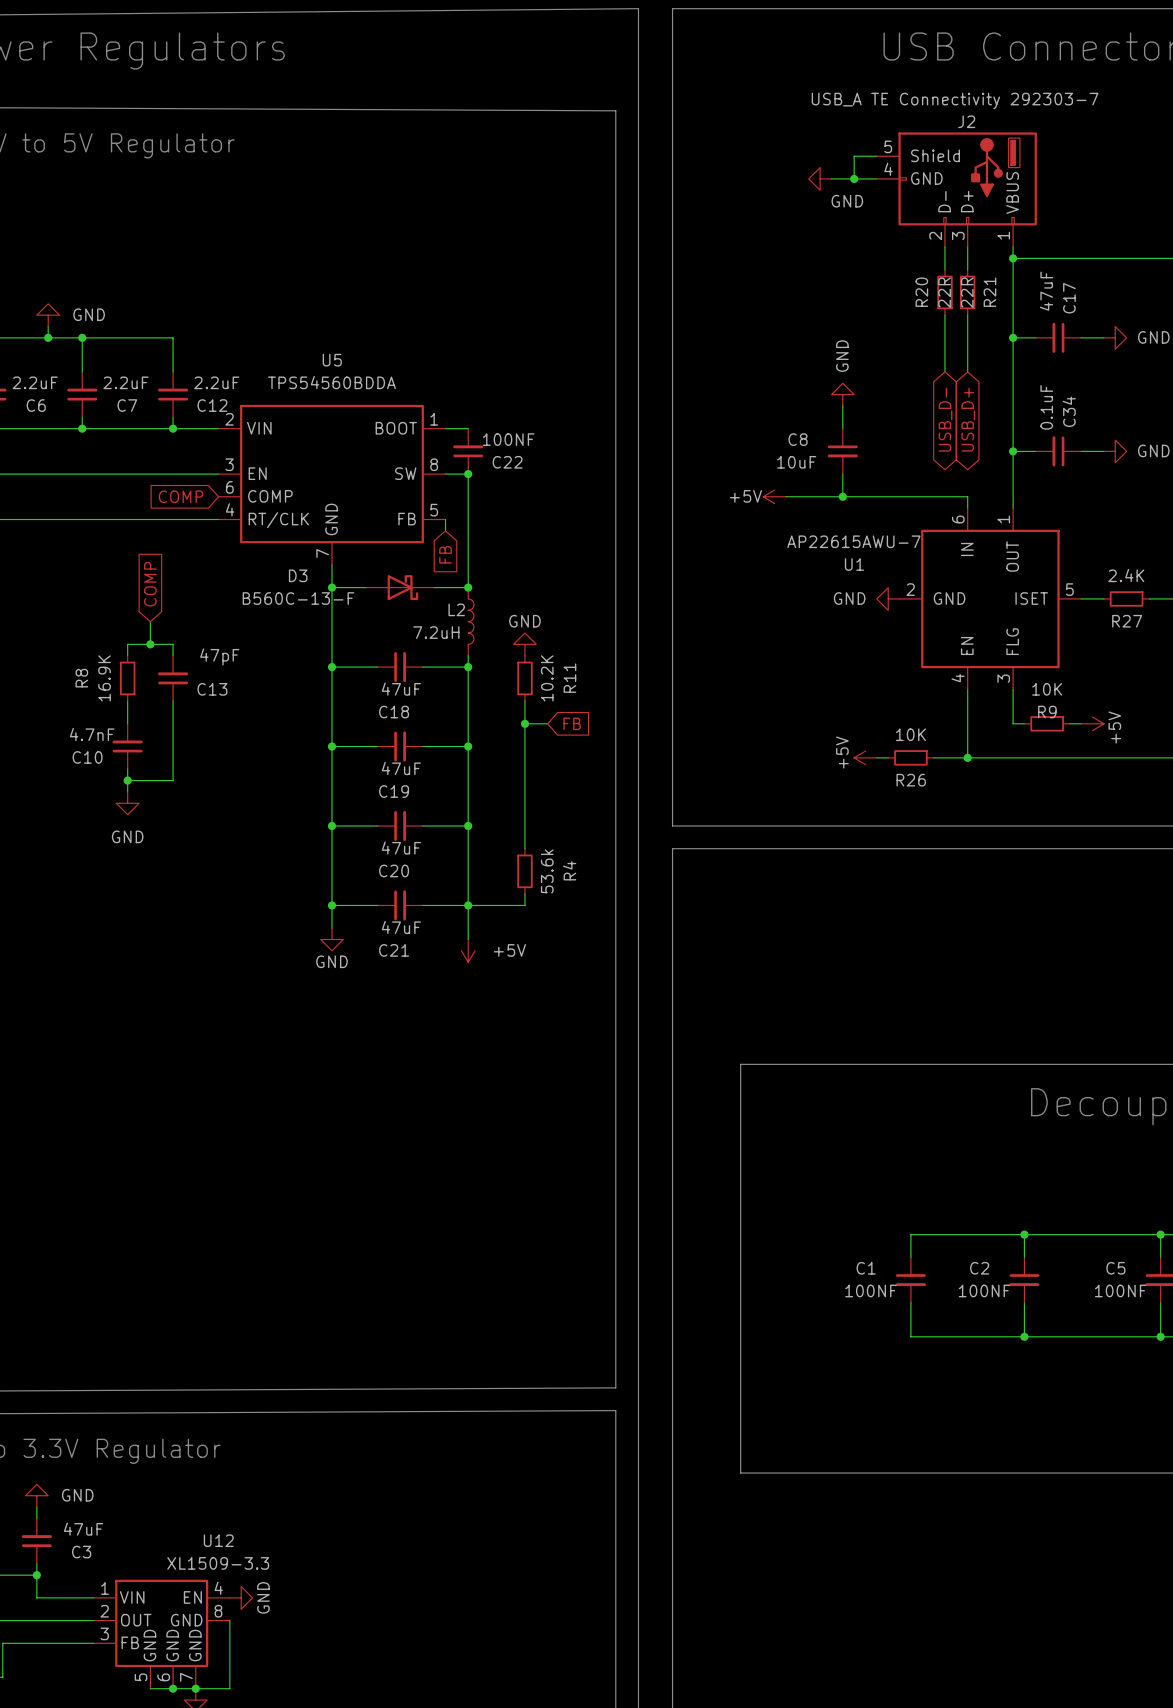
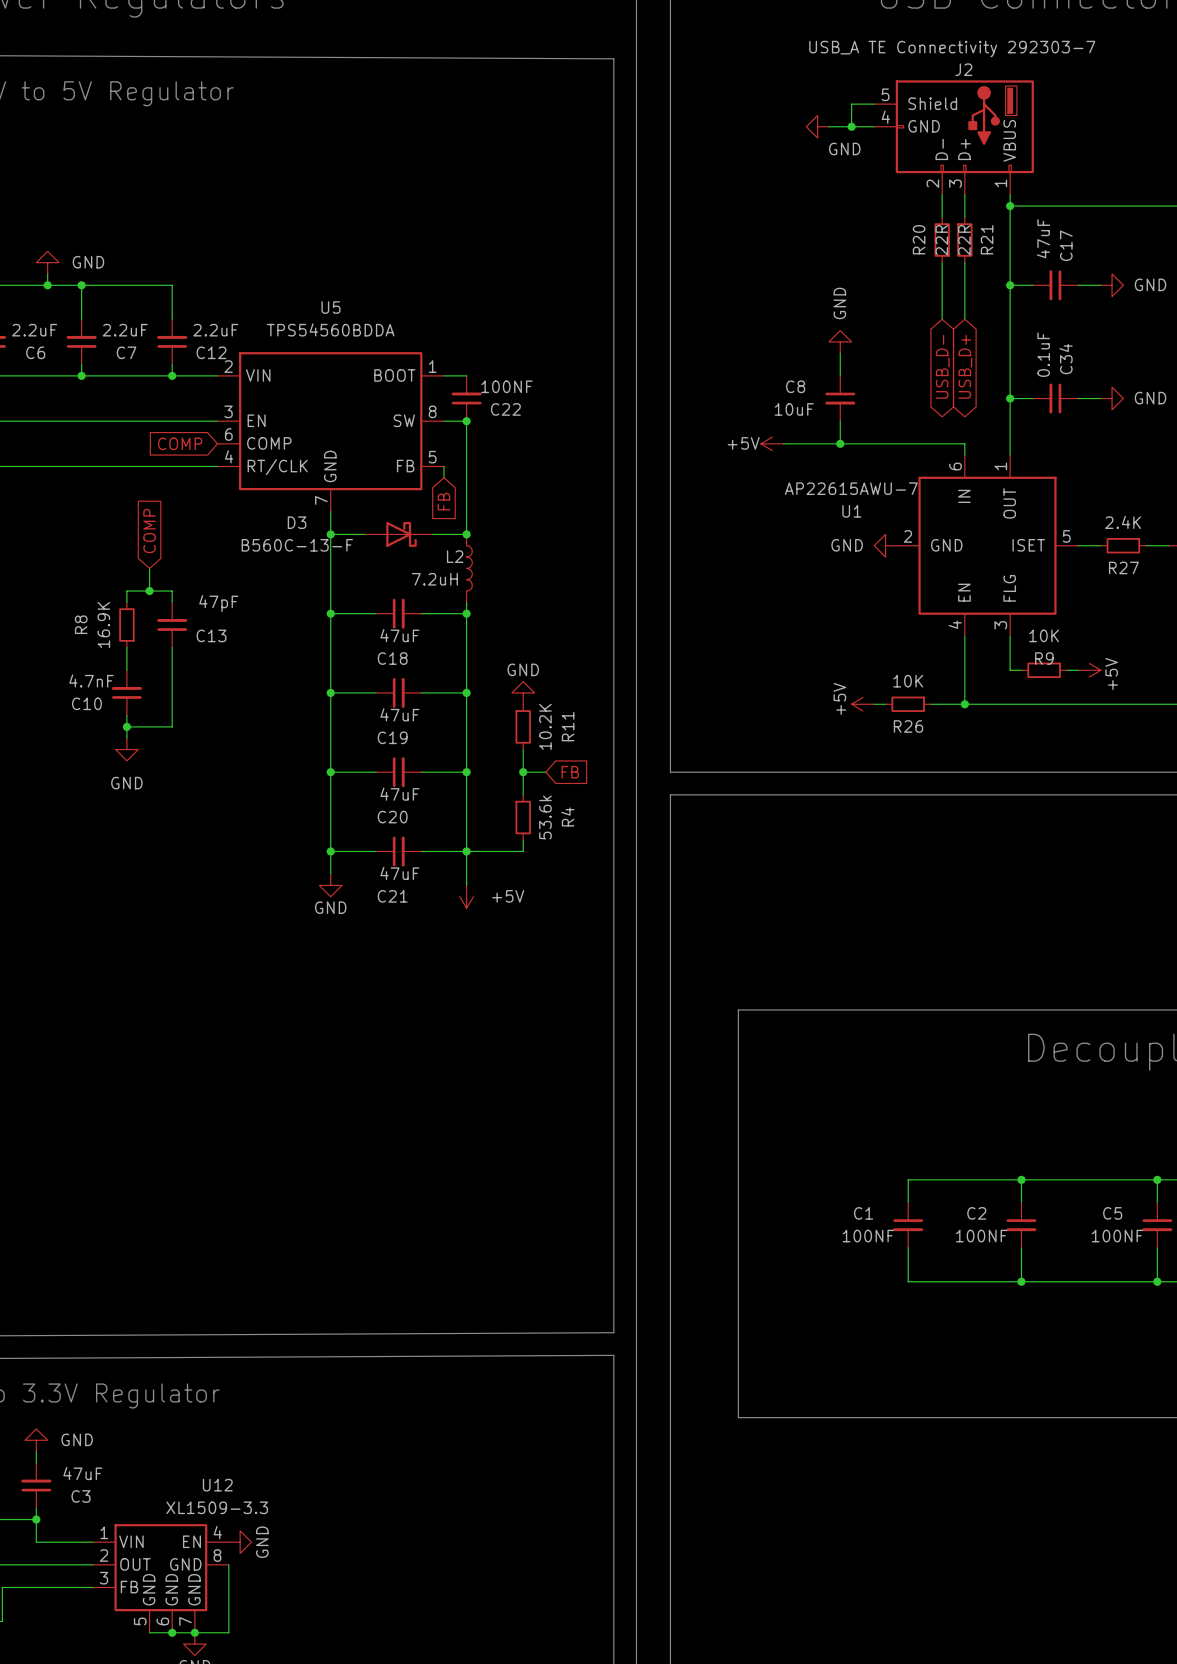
power symbol position: GND (524, 644) -> GND (523, 692)
R11 position: (524, 678) -> (523, 726)
wire: (524, 701) (524, 803) -> none
wire: (524, 723) (547, 723) -> (523, 772) (545, 772)
junction: (524, 723) -> none
global label position: FB (572, 723) -> FB (570, 772)
junction: none -> (523, 772)

